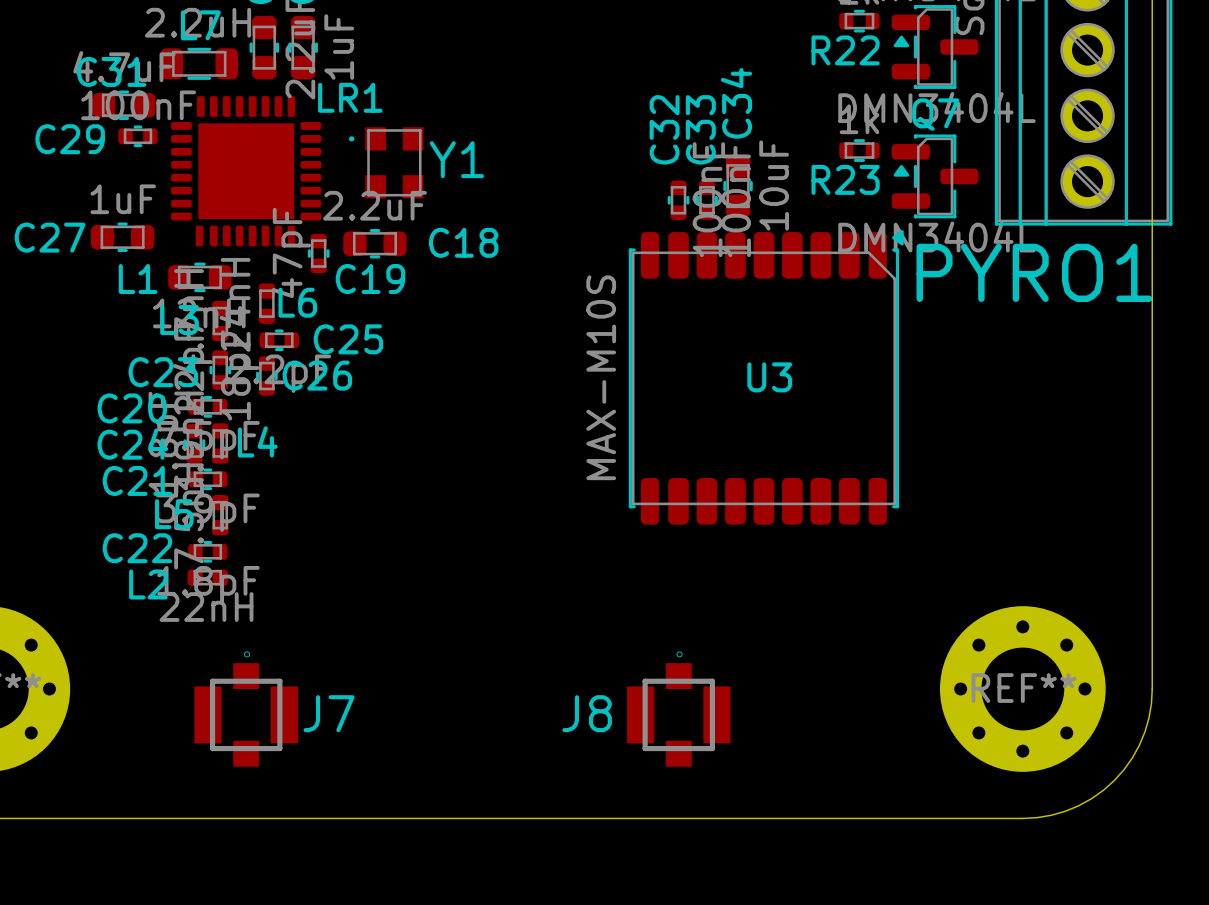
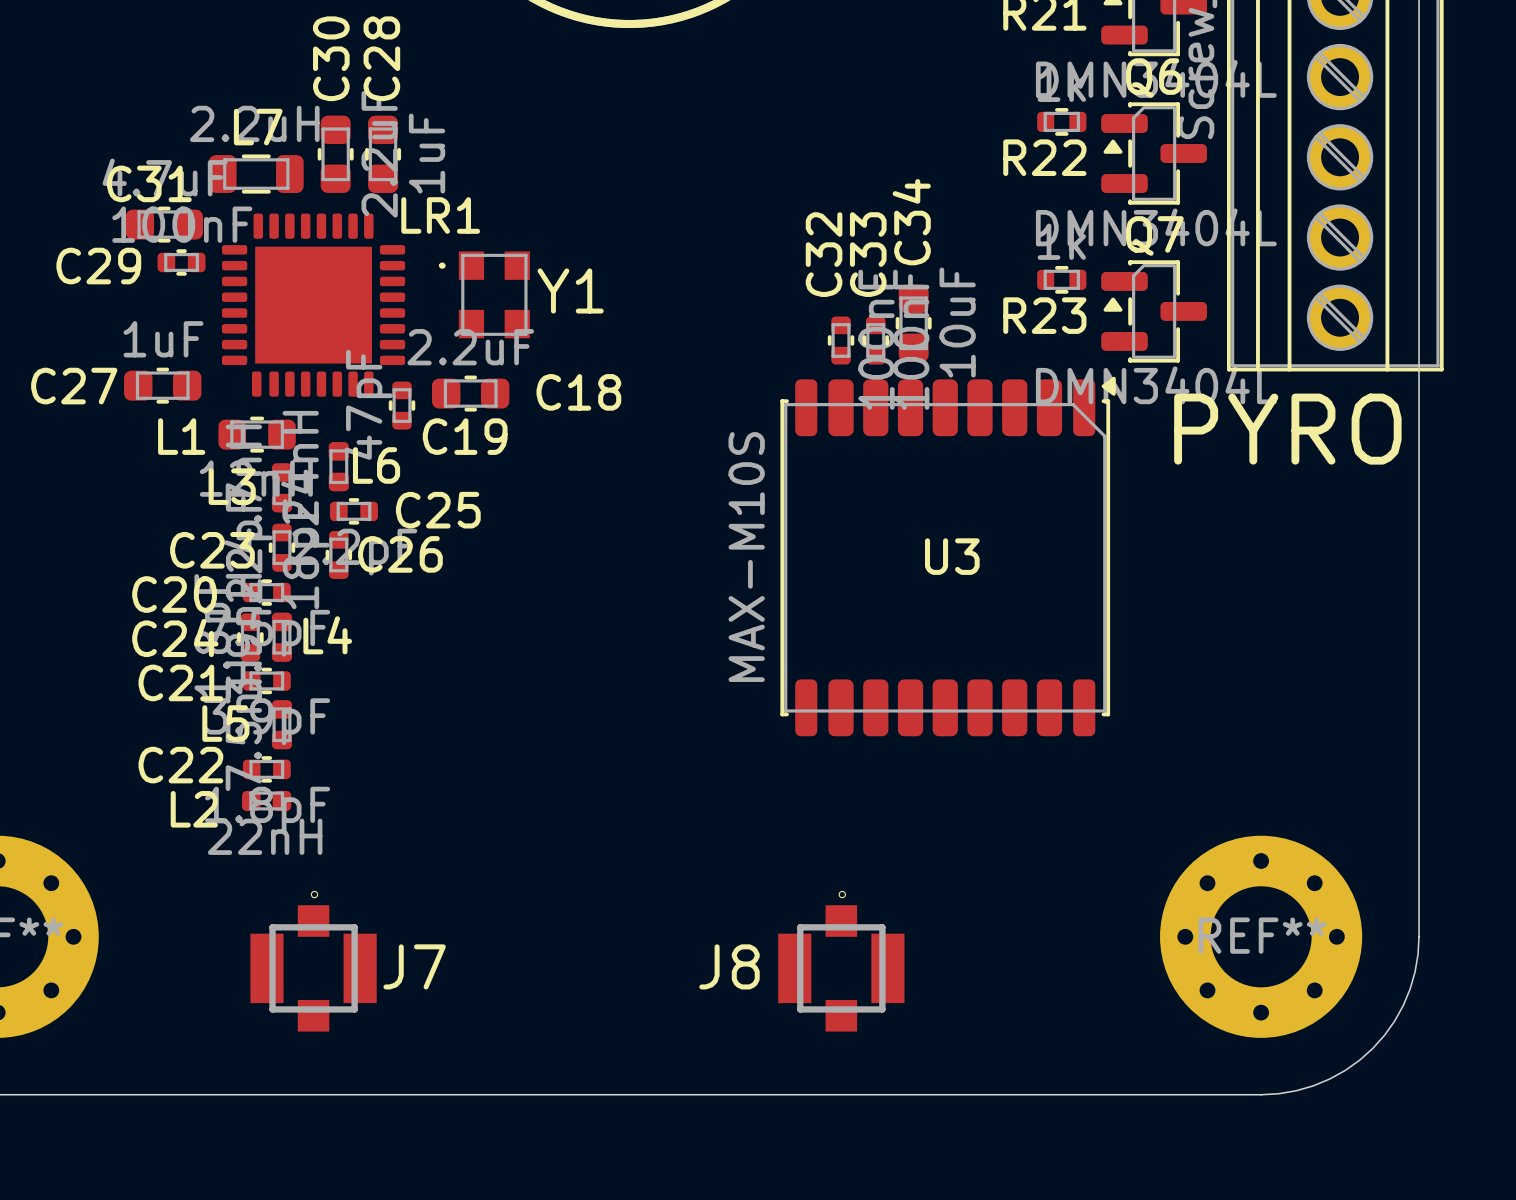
PYRO1 name: PYRO1 (1034, 272) -> PYRO (1287, 429)

